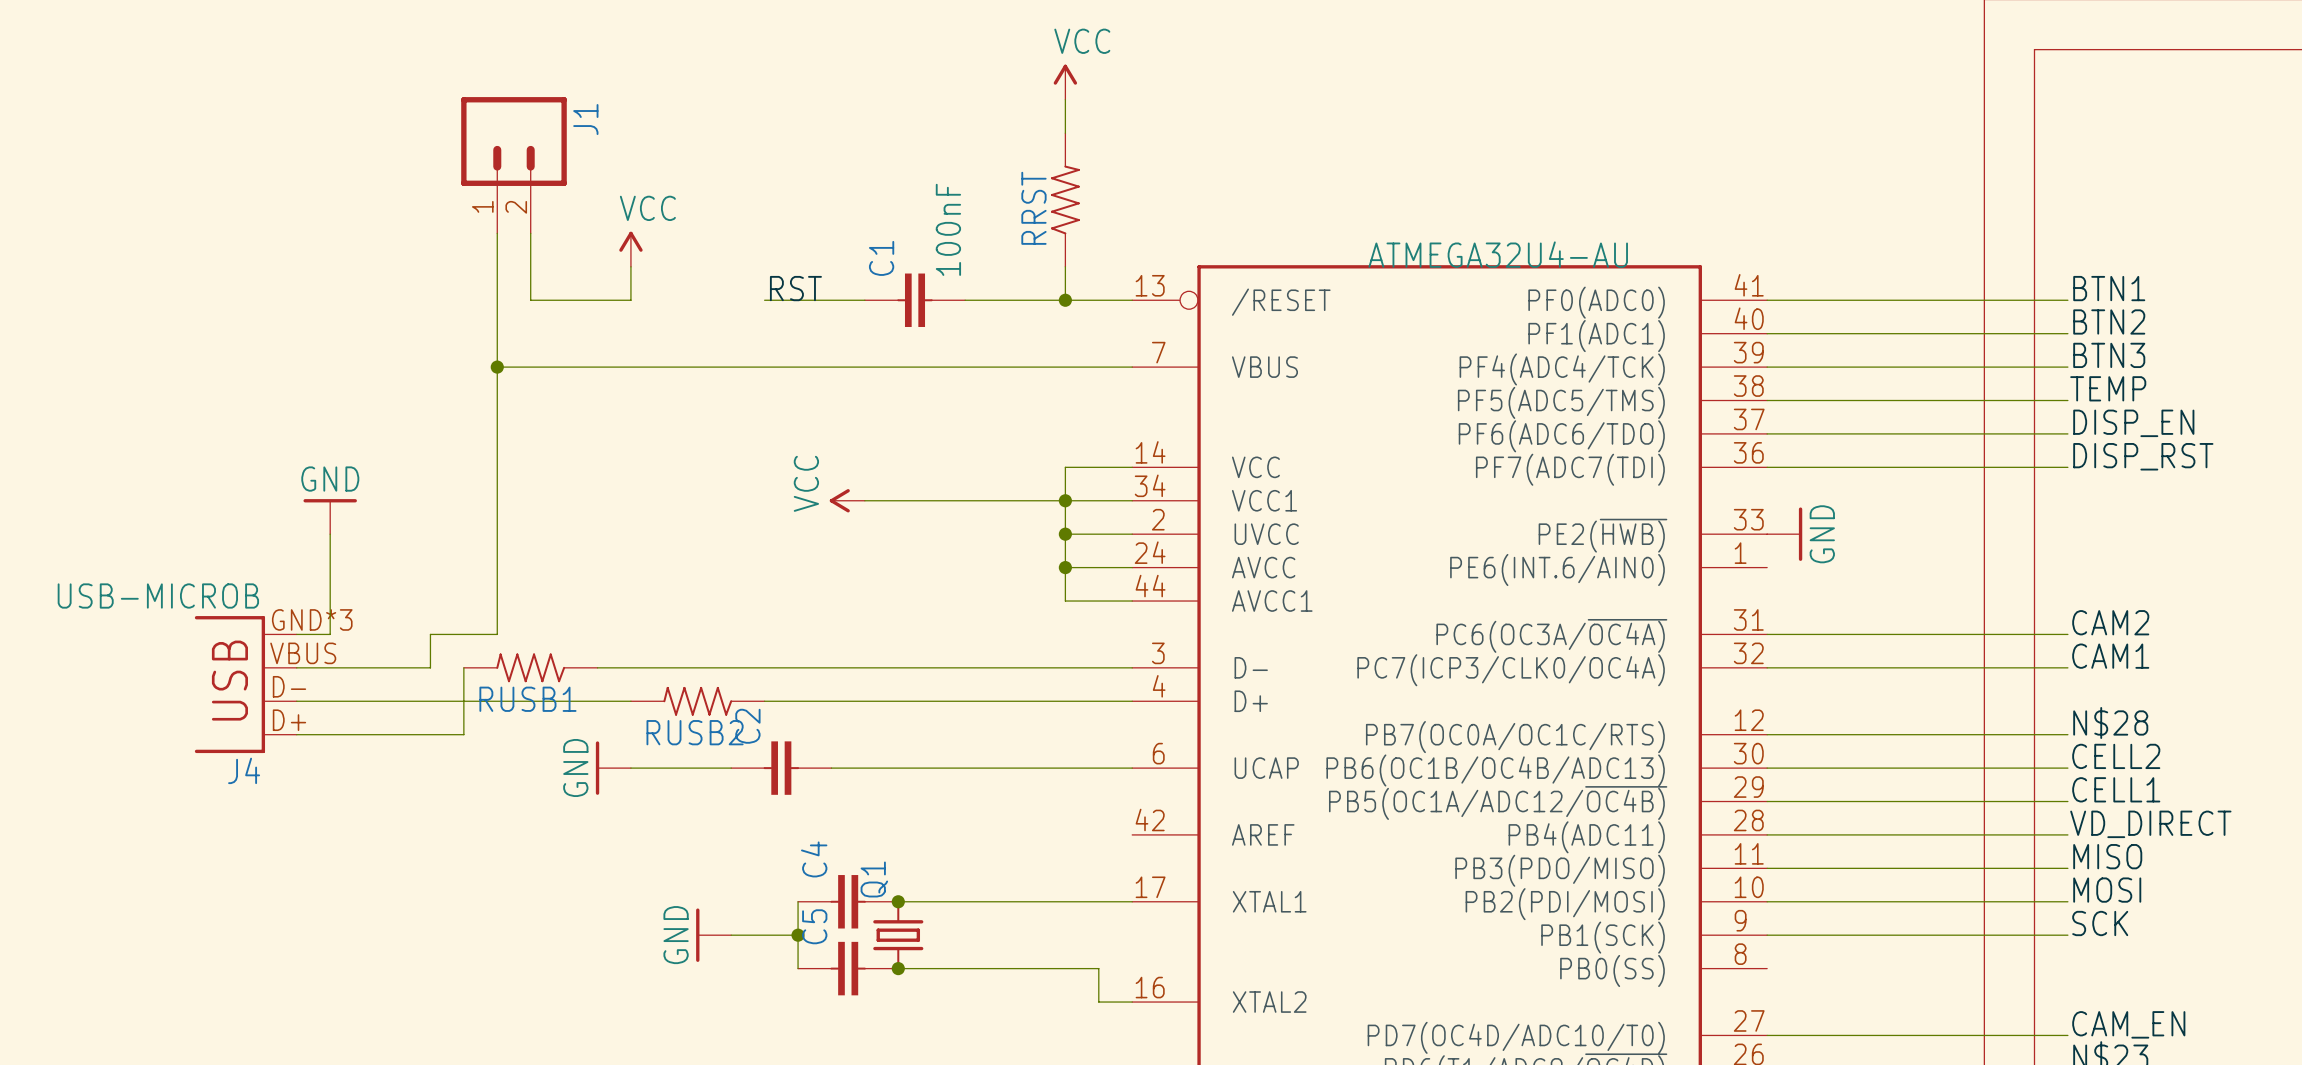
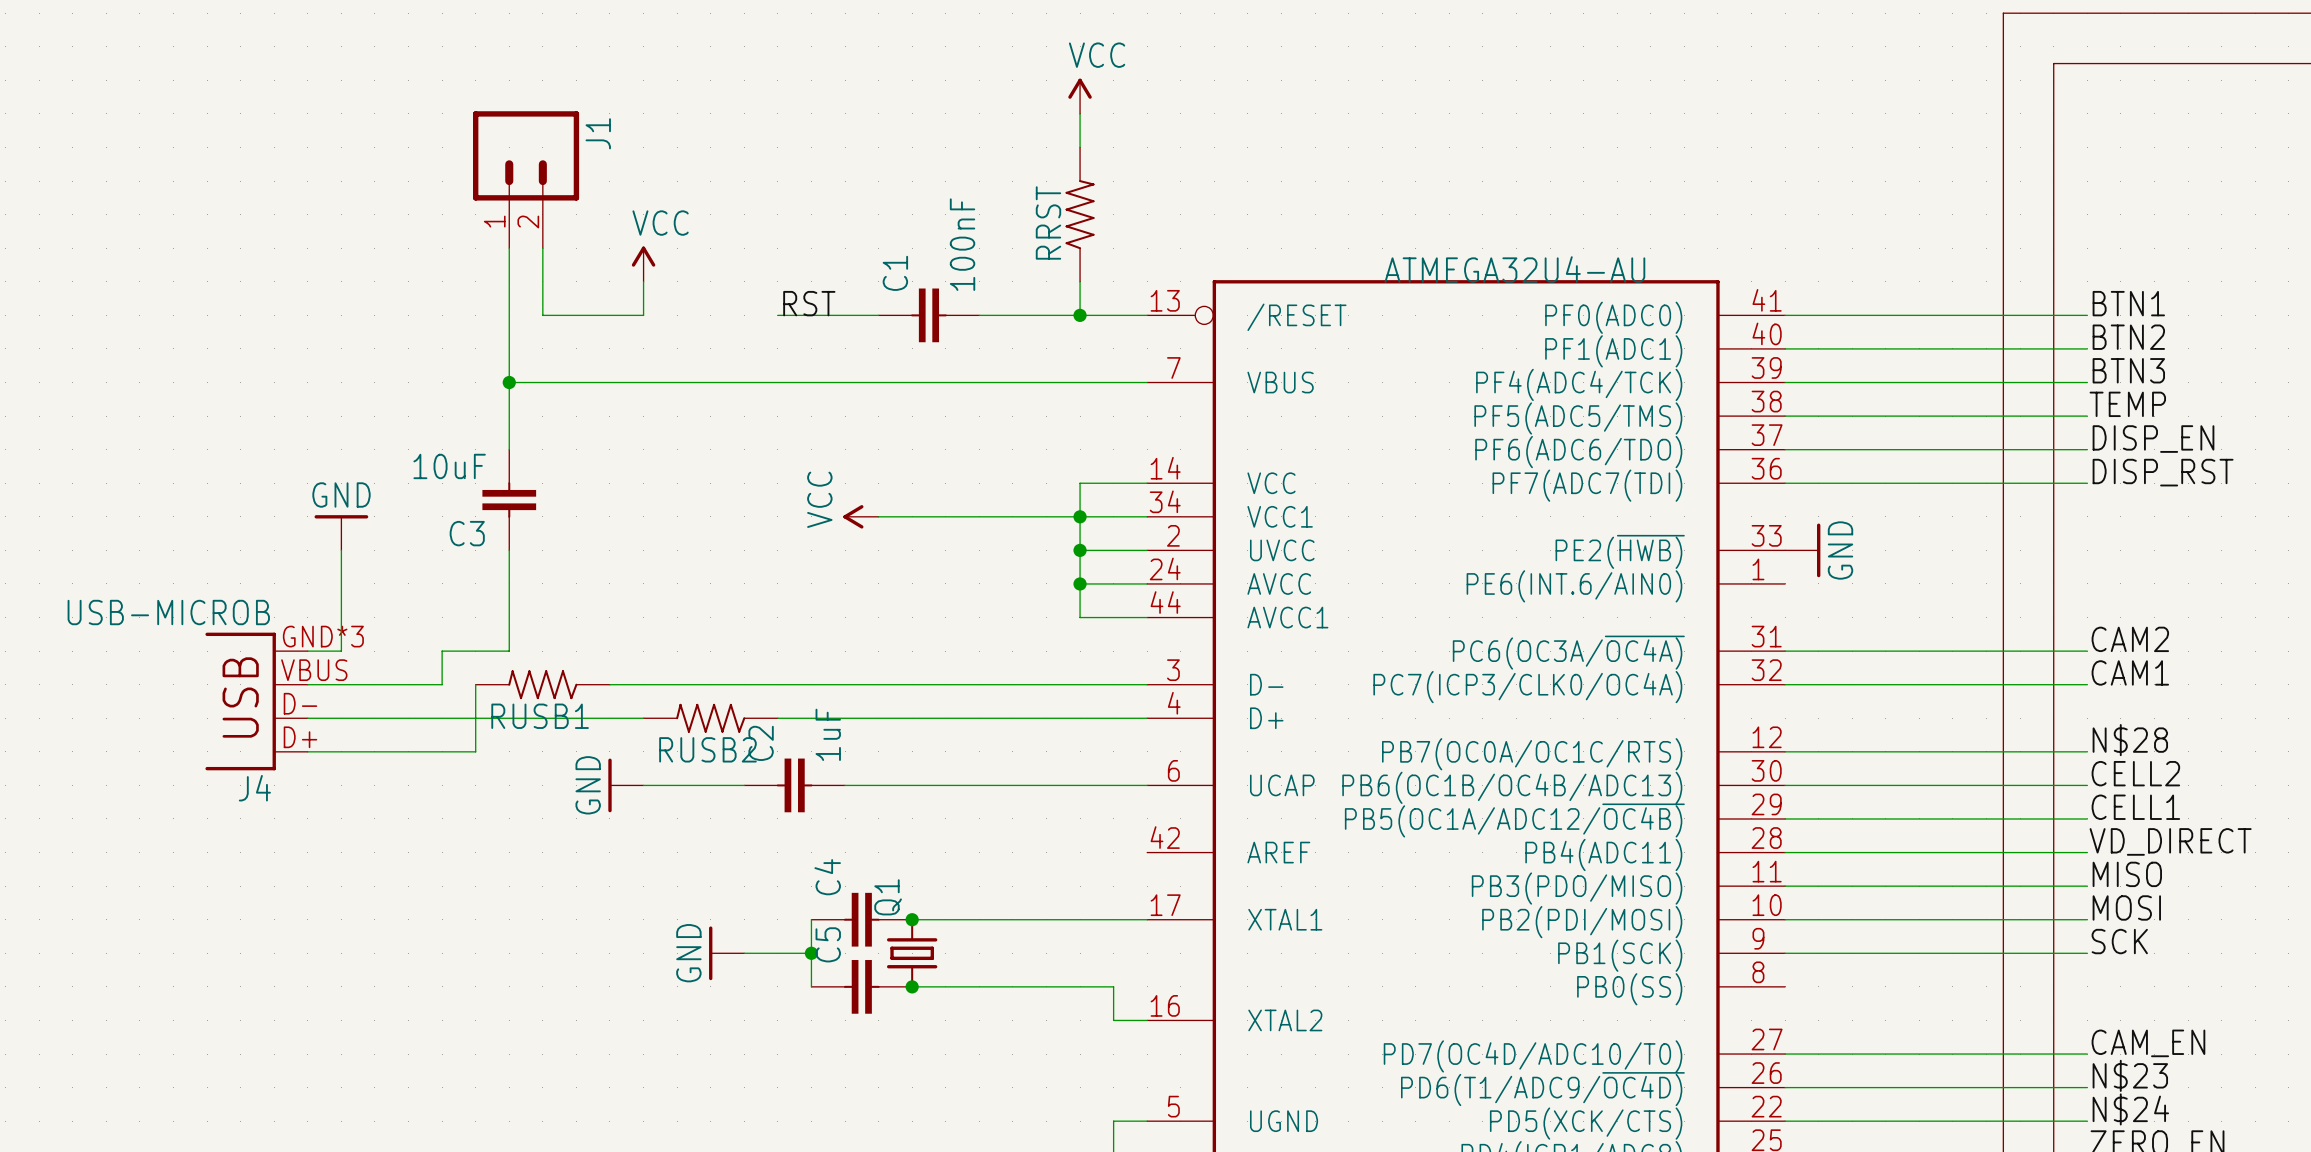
C3: none -> 10uF (509, 500)
C2 value: none -> 1uF (828, 734)

